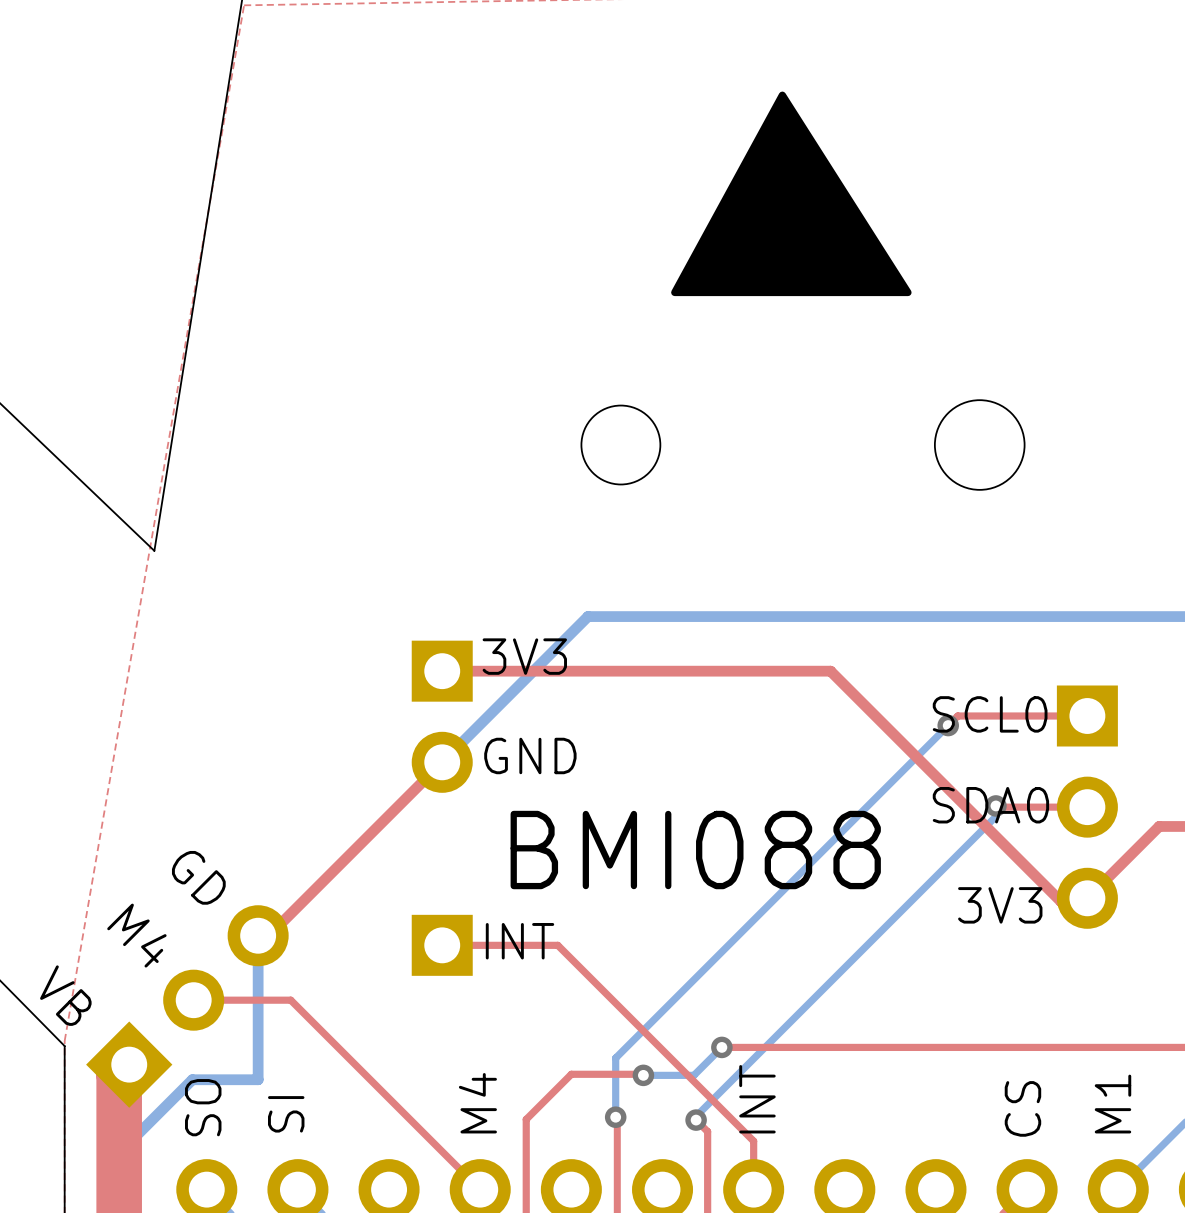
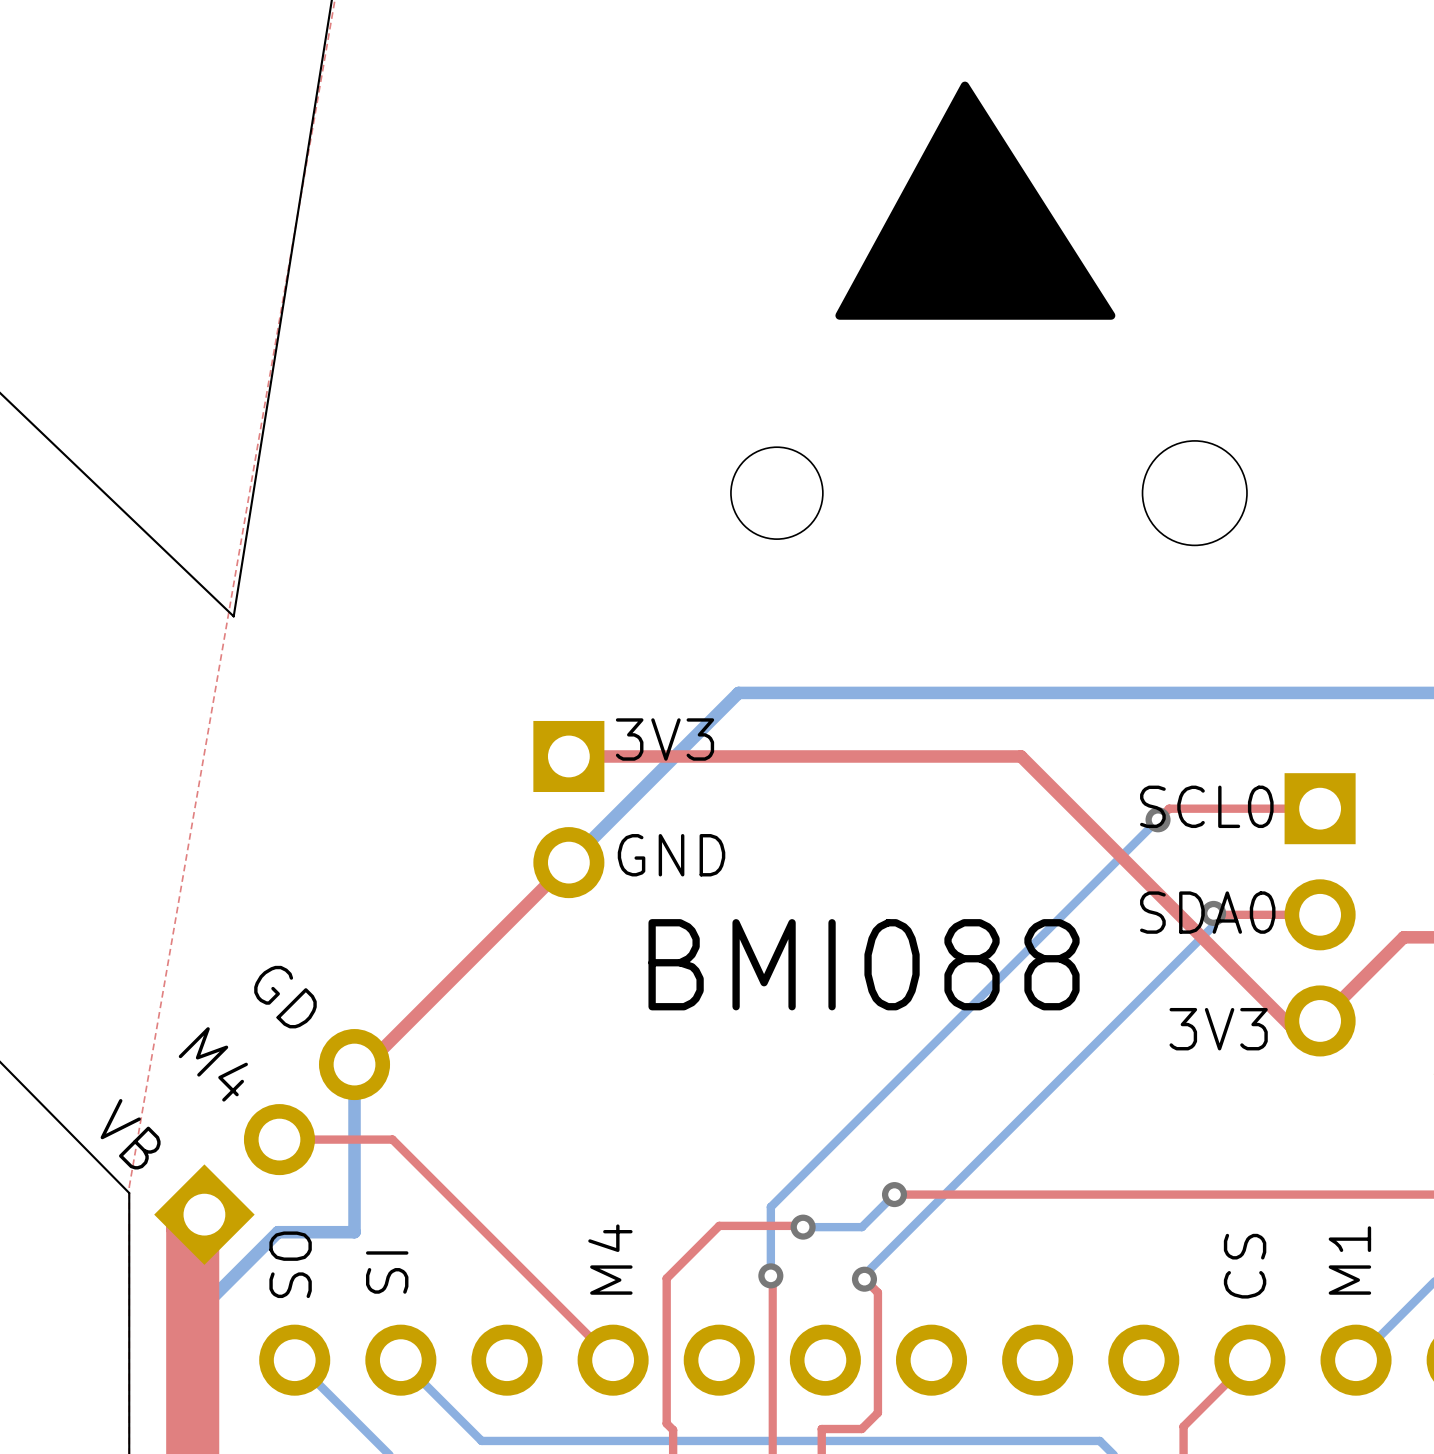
text: INT (520, 941) -> none
top track: (442, 945) (557, 945) (753, 1141) (753, 1189) -> none
part: (442, 945) -> none
text: INT (757, 1099) -> none

